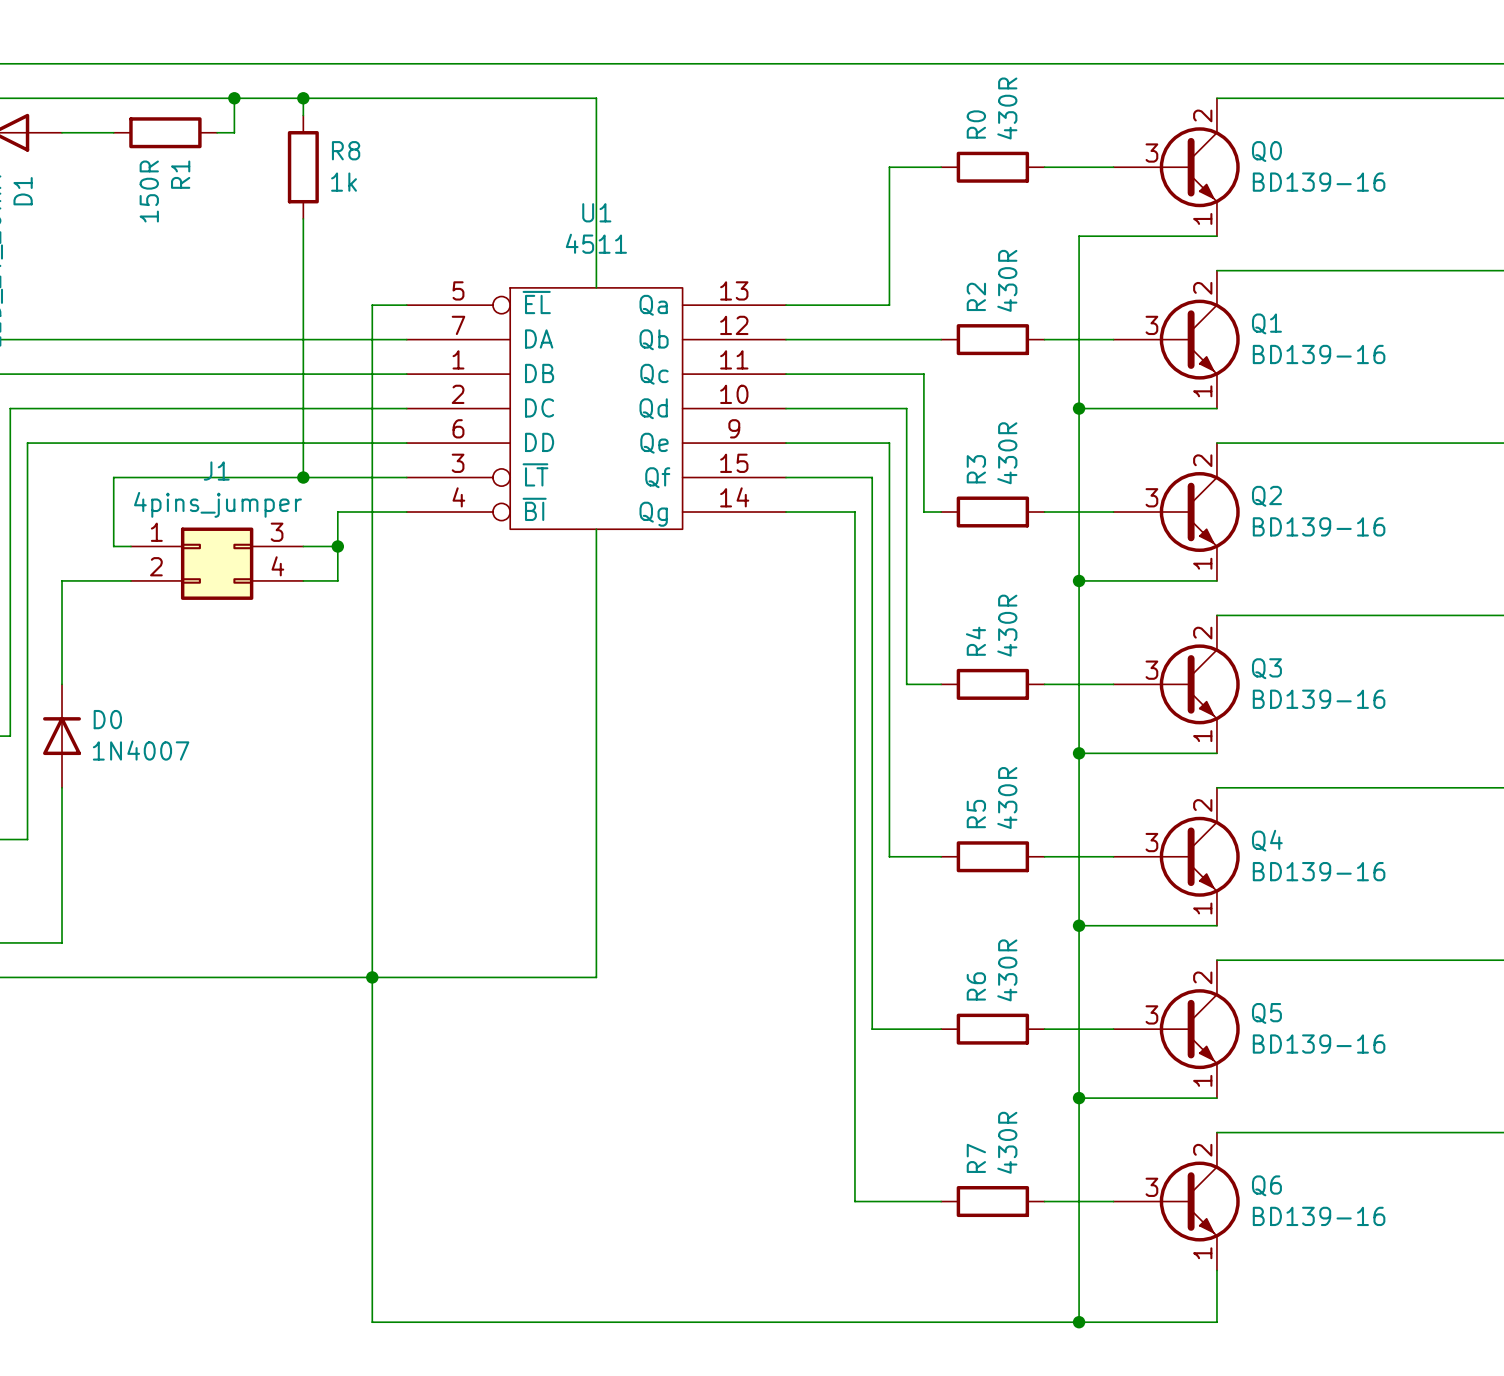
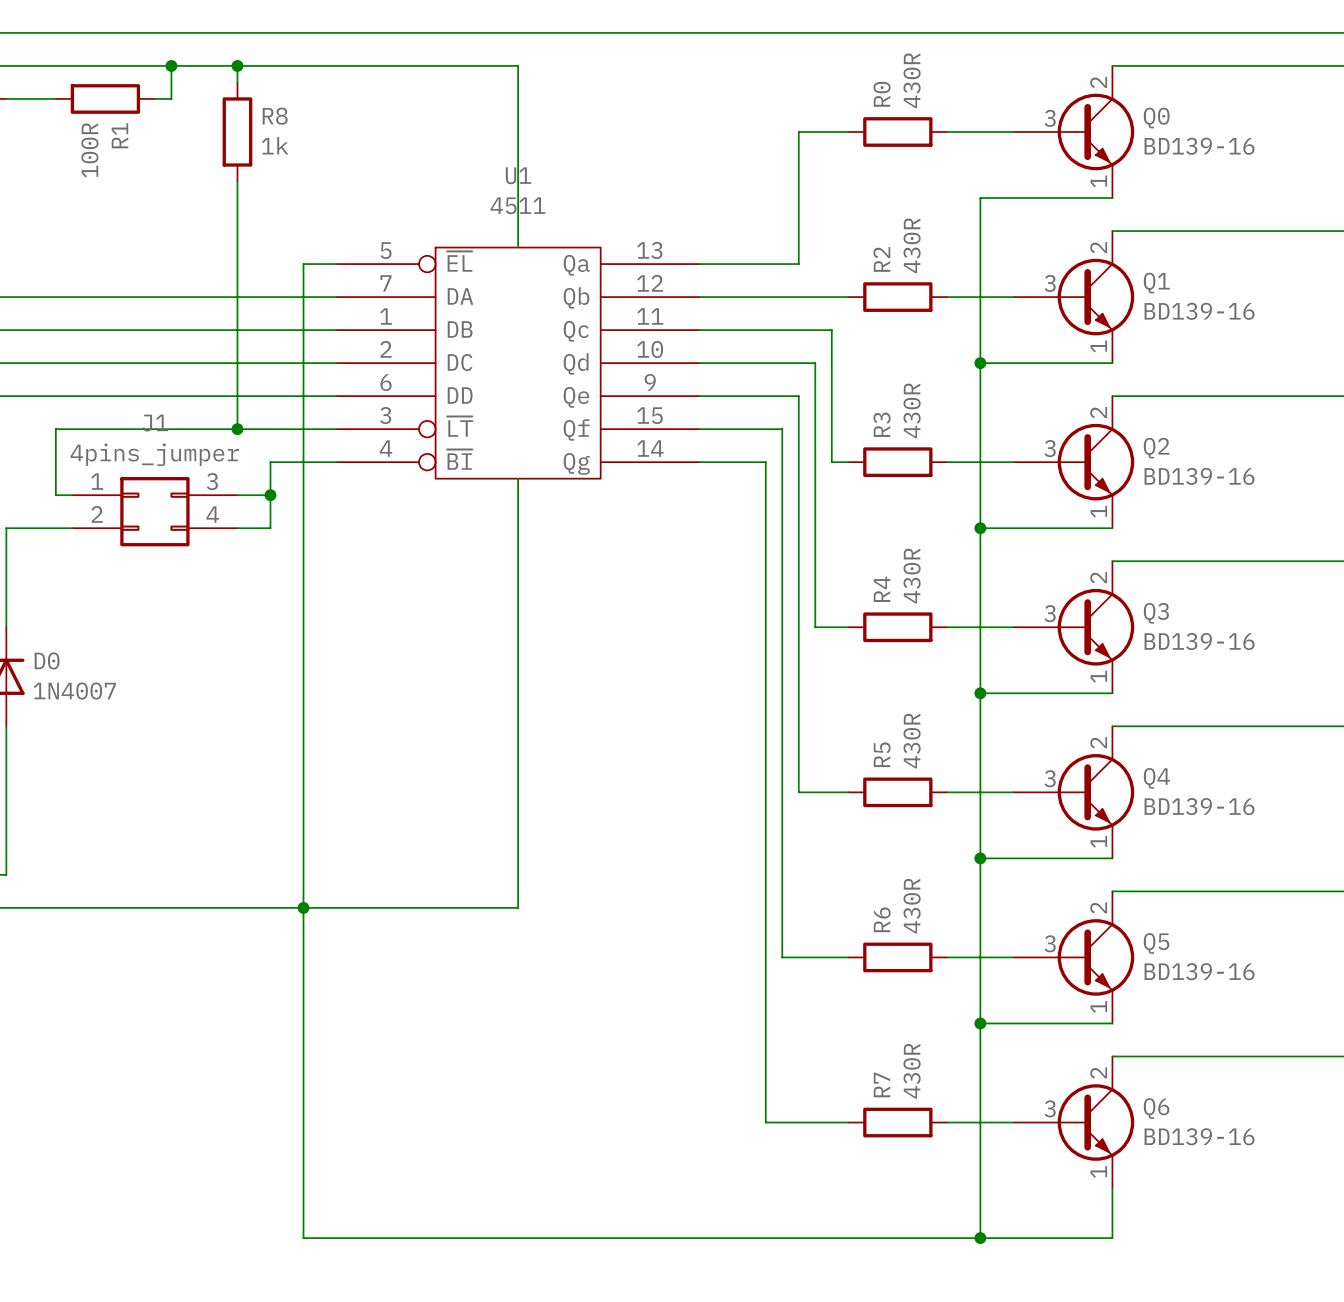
R1 value: 150R (149, 191) -> 100R (89, 150)

